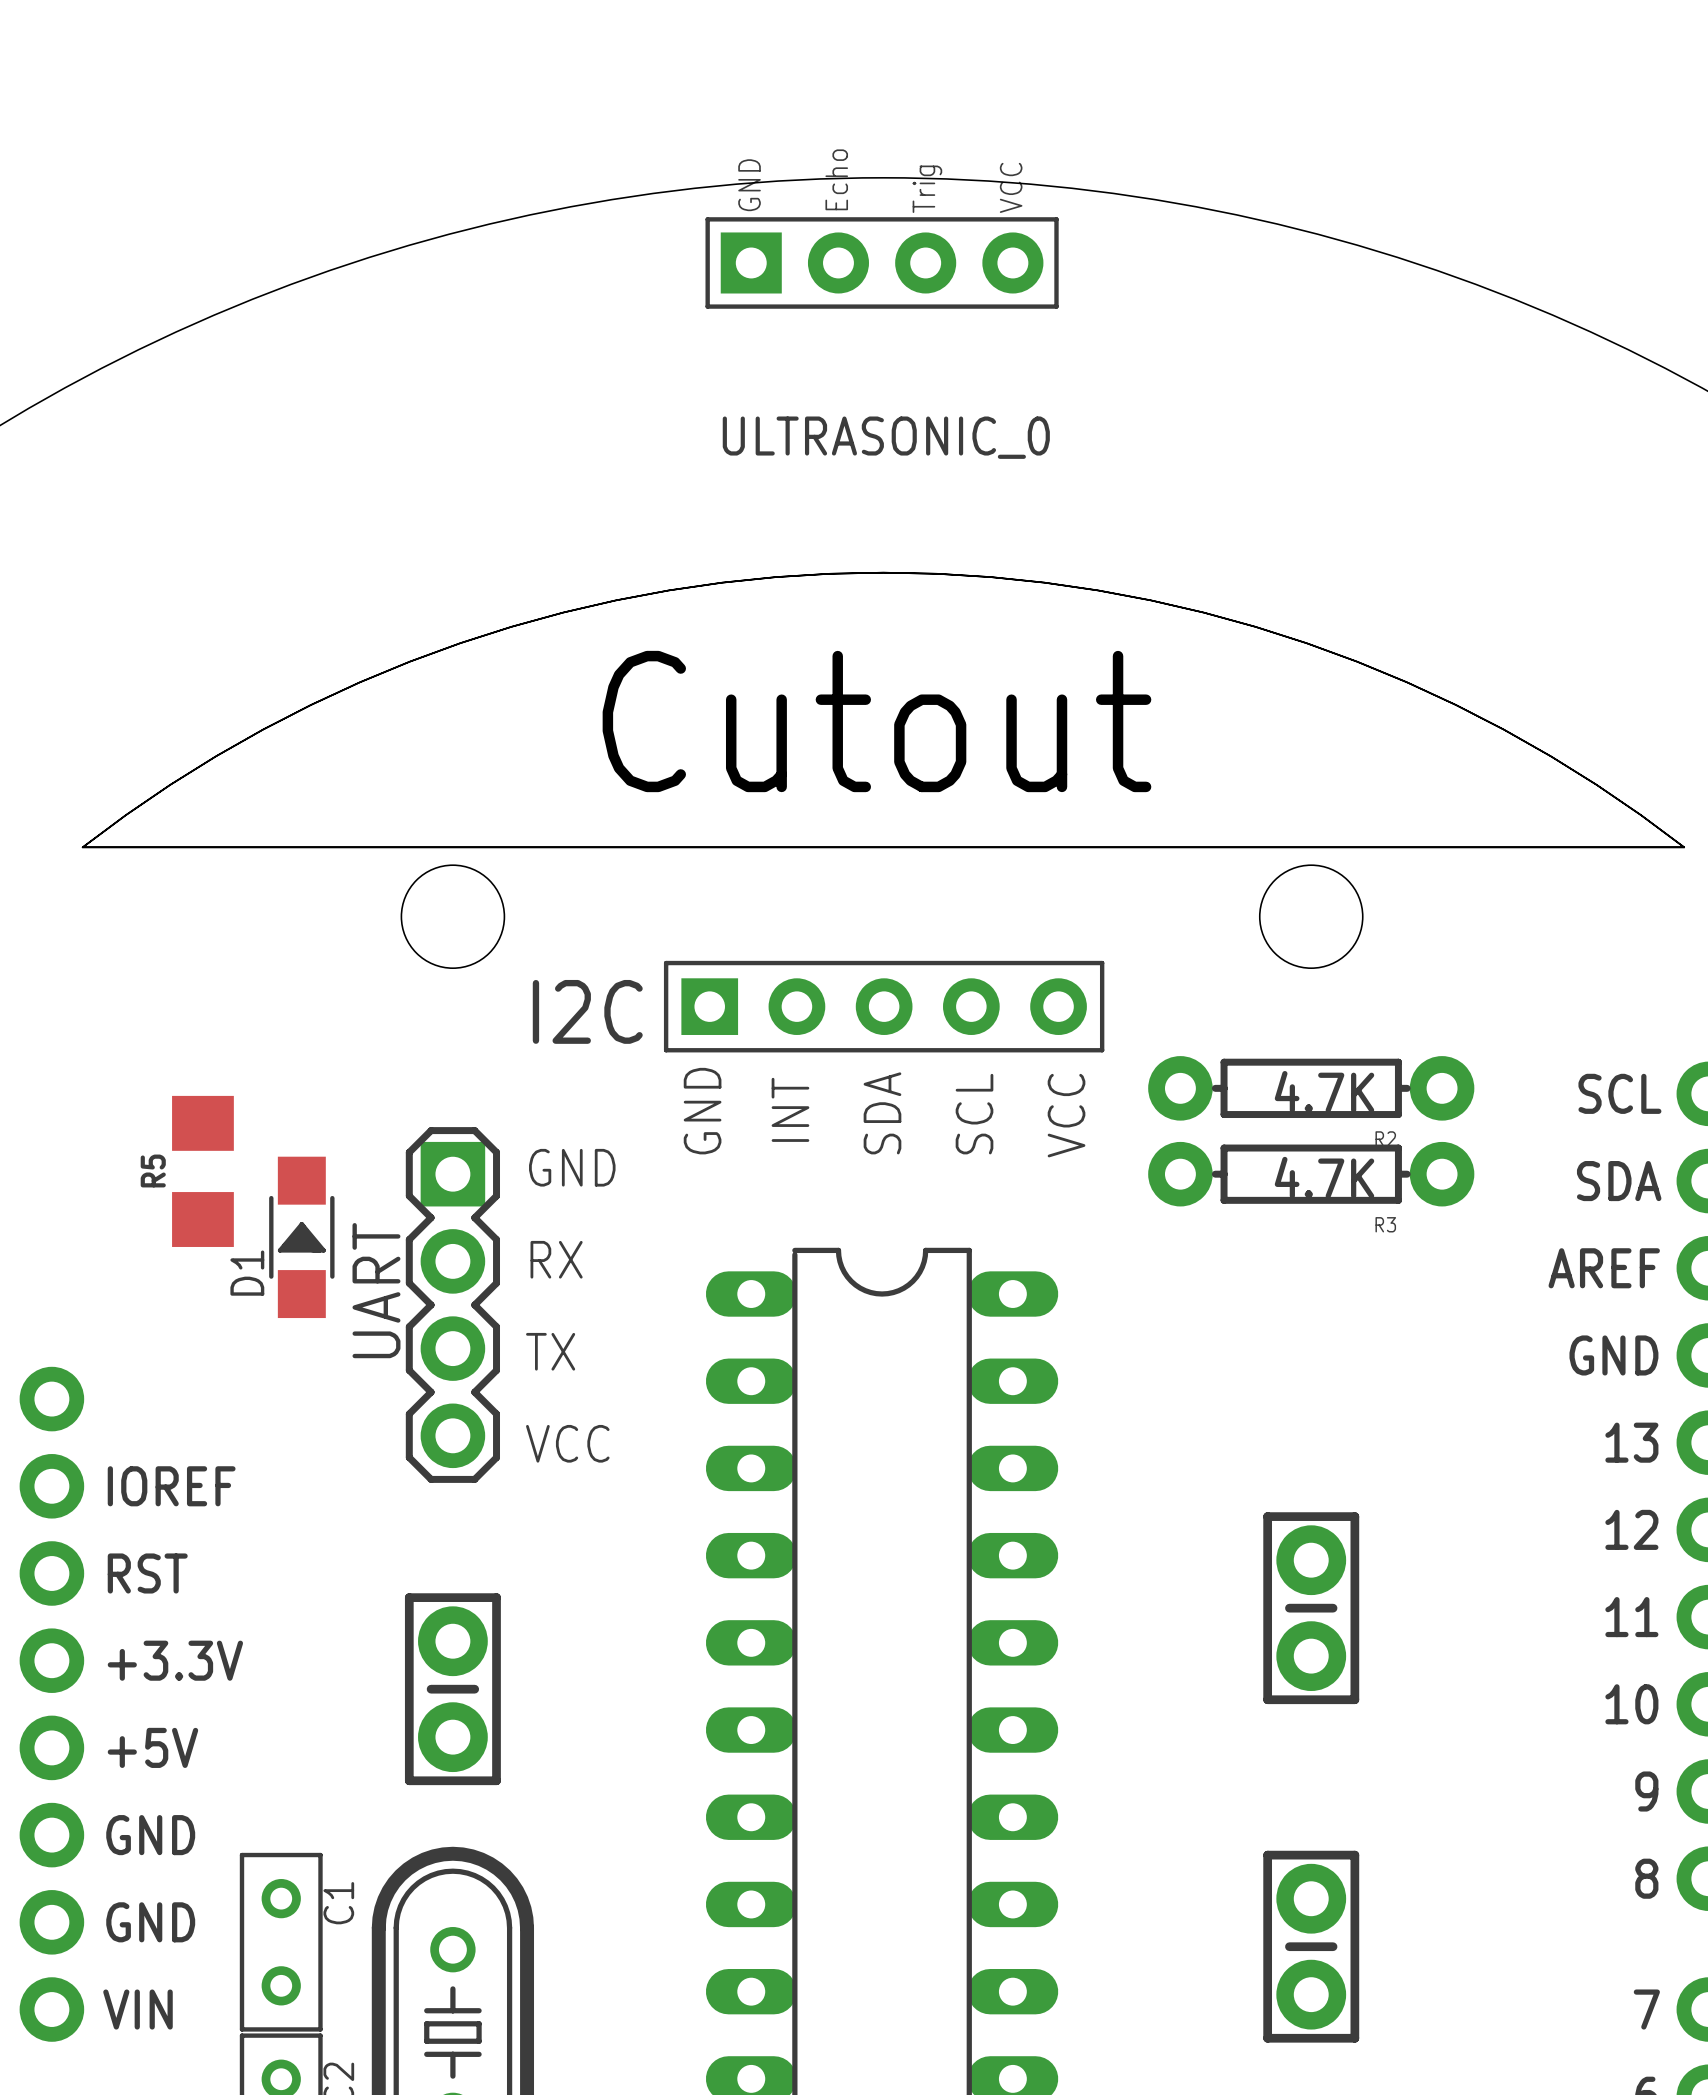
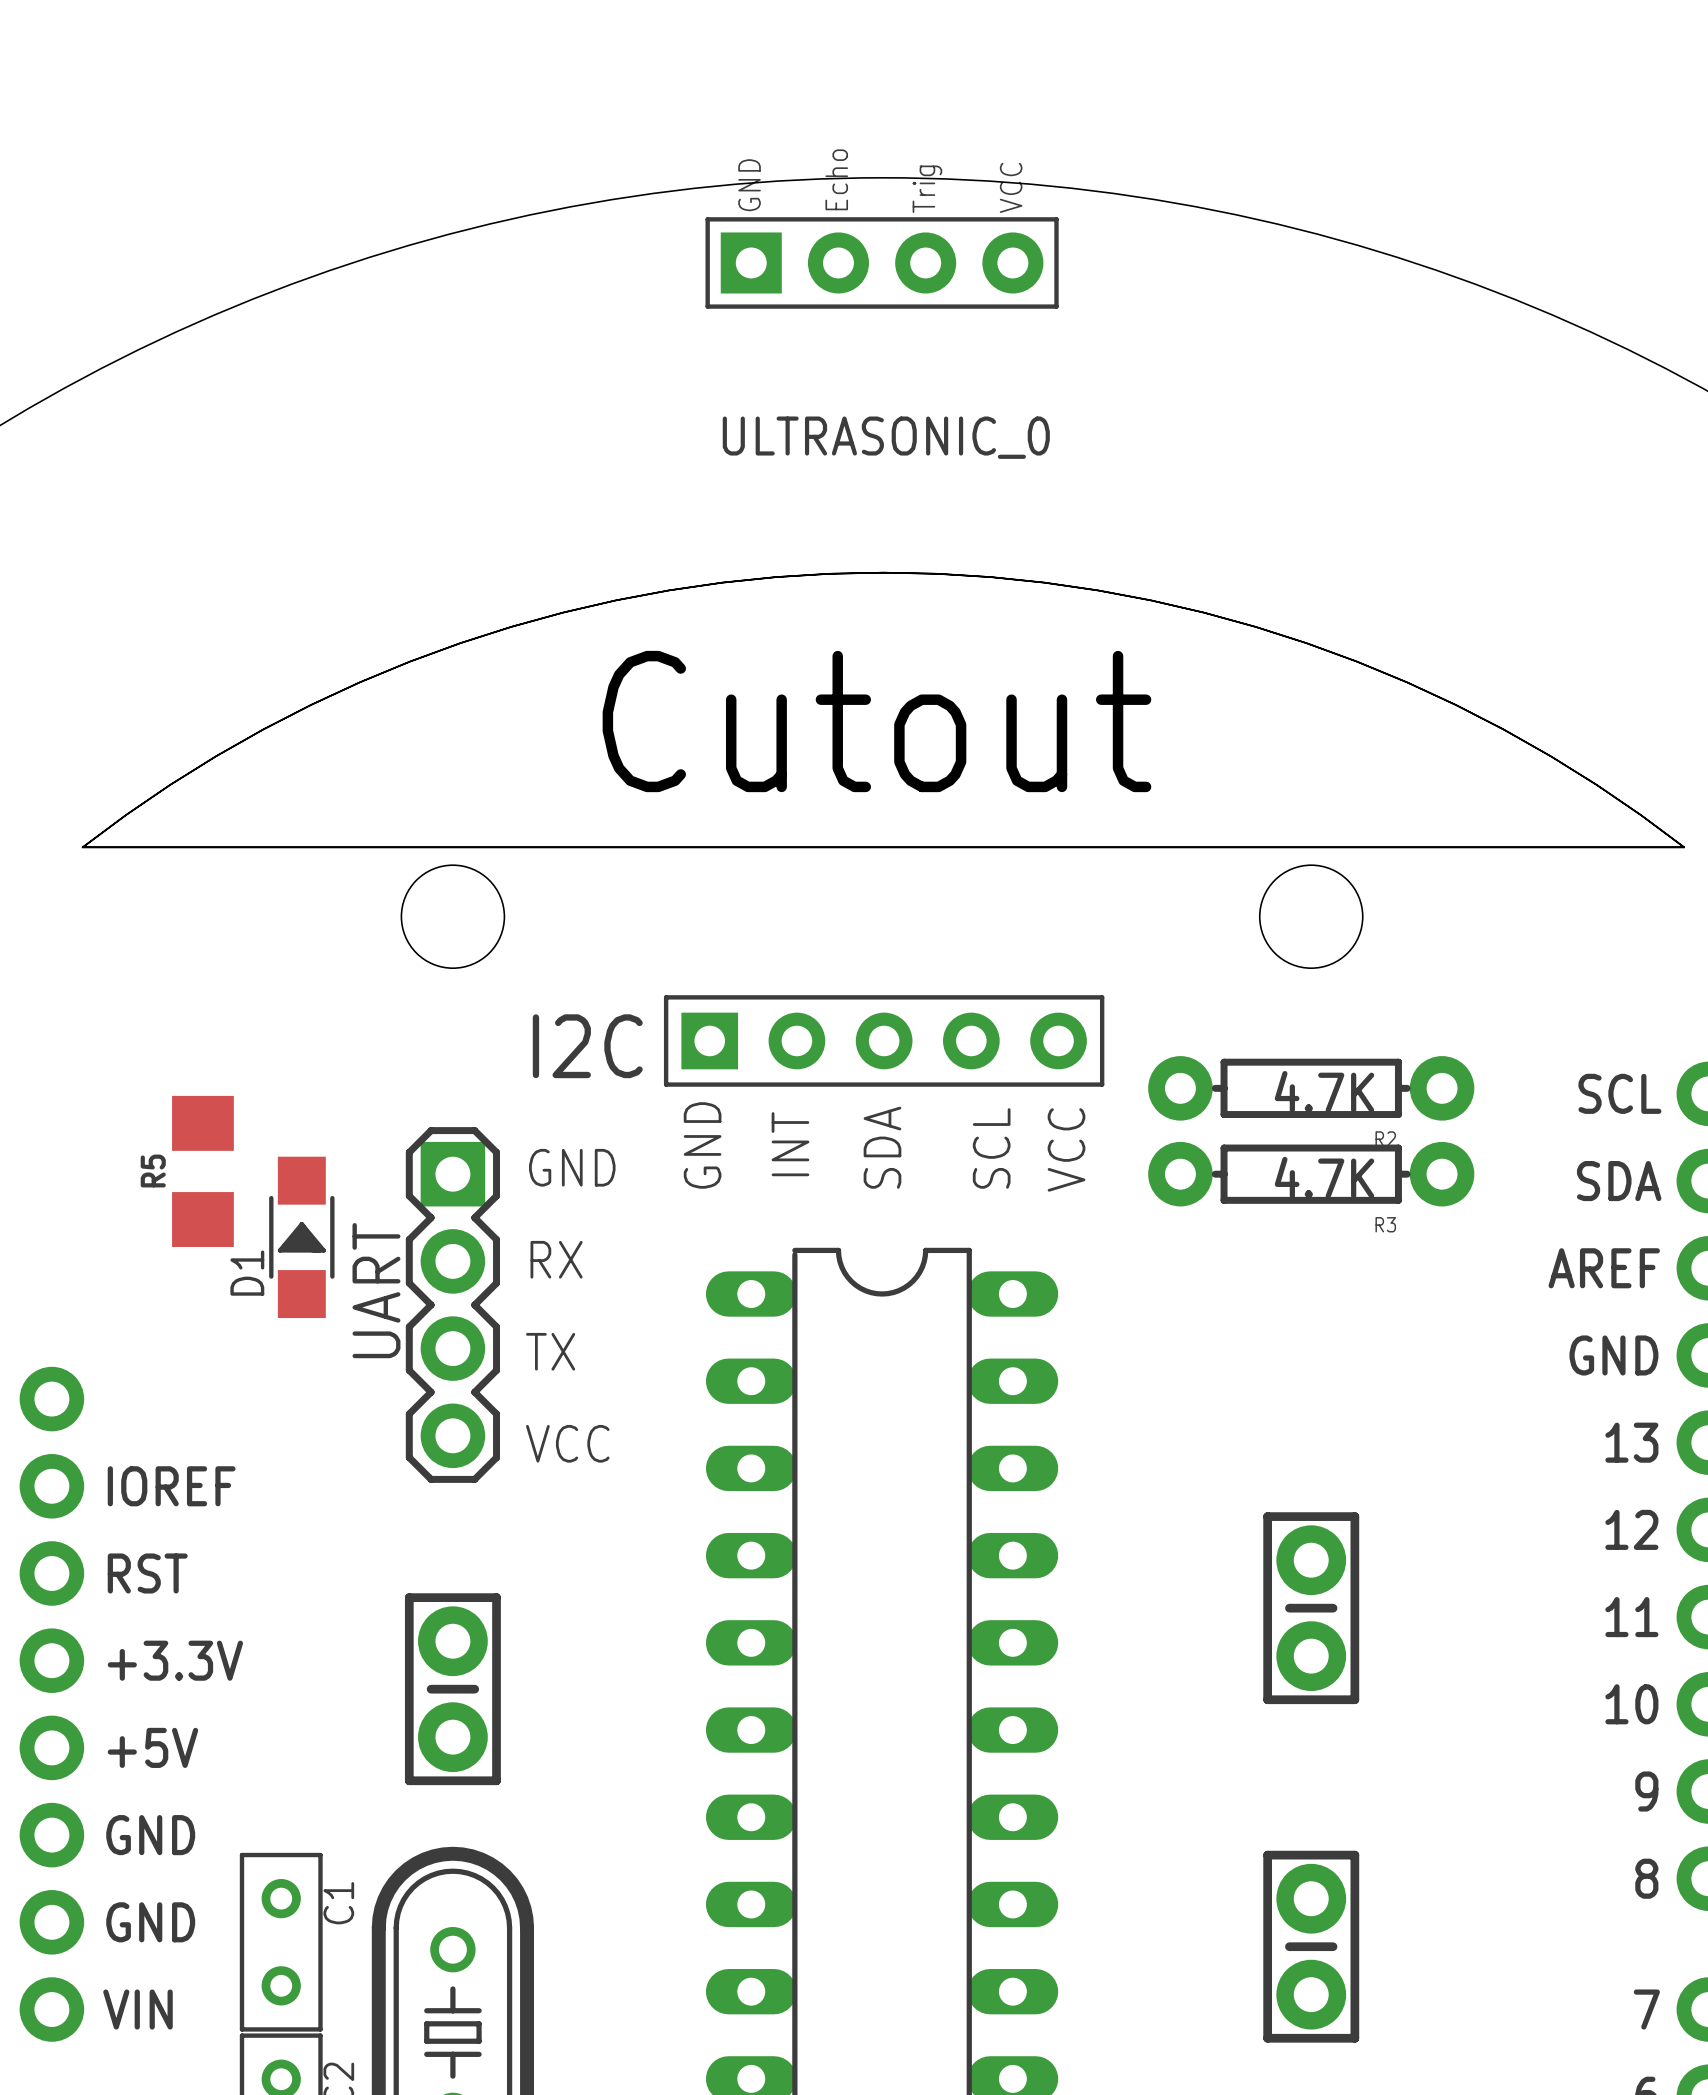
I2C position: (884, 1006) -> (884, 1040)
text position: INT (790, 1109) -> INT (790, 1144)
text position: GND (702, 1111) -> GND (702, 1145)
text position: SDA (882, 1113) -> SDA (882, 1147)
text position: SCL (974, 1114) -> SCL (991, 1148)
text position: VCC (1066, 1115) -> VCC (1066, 1149)

